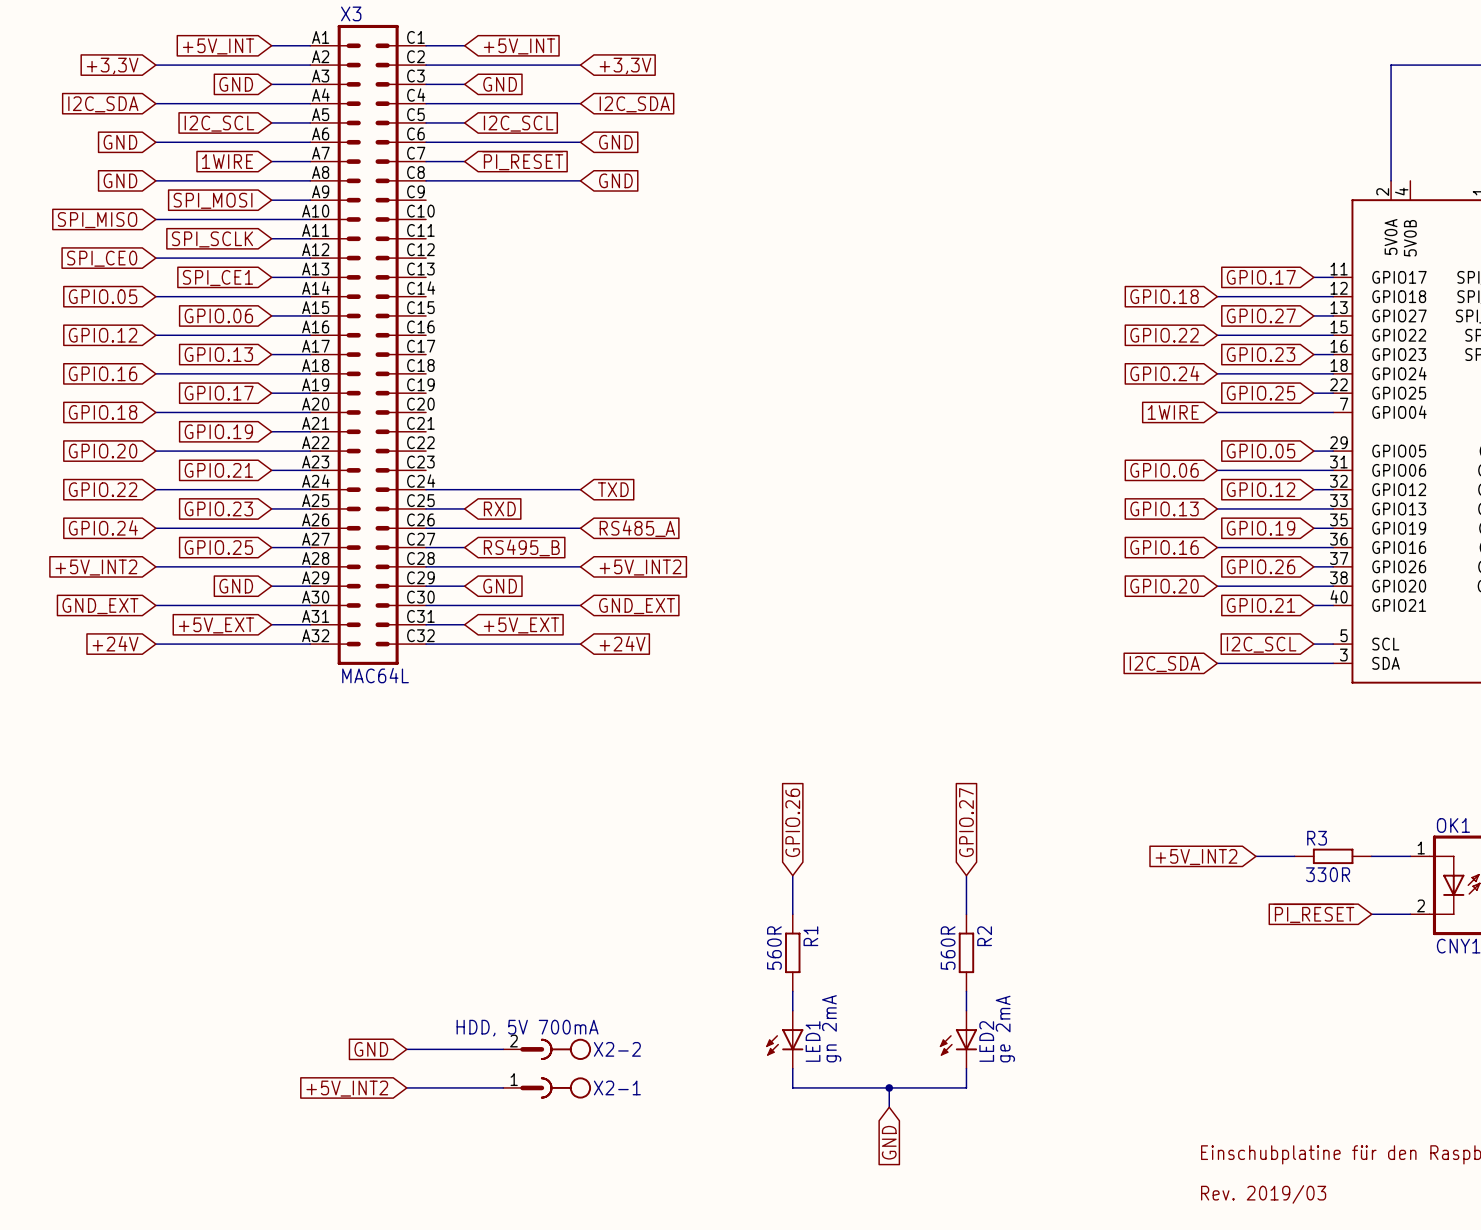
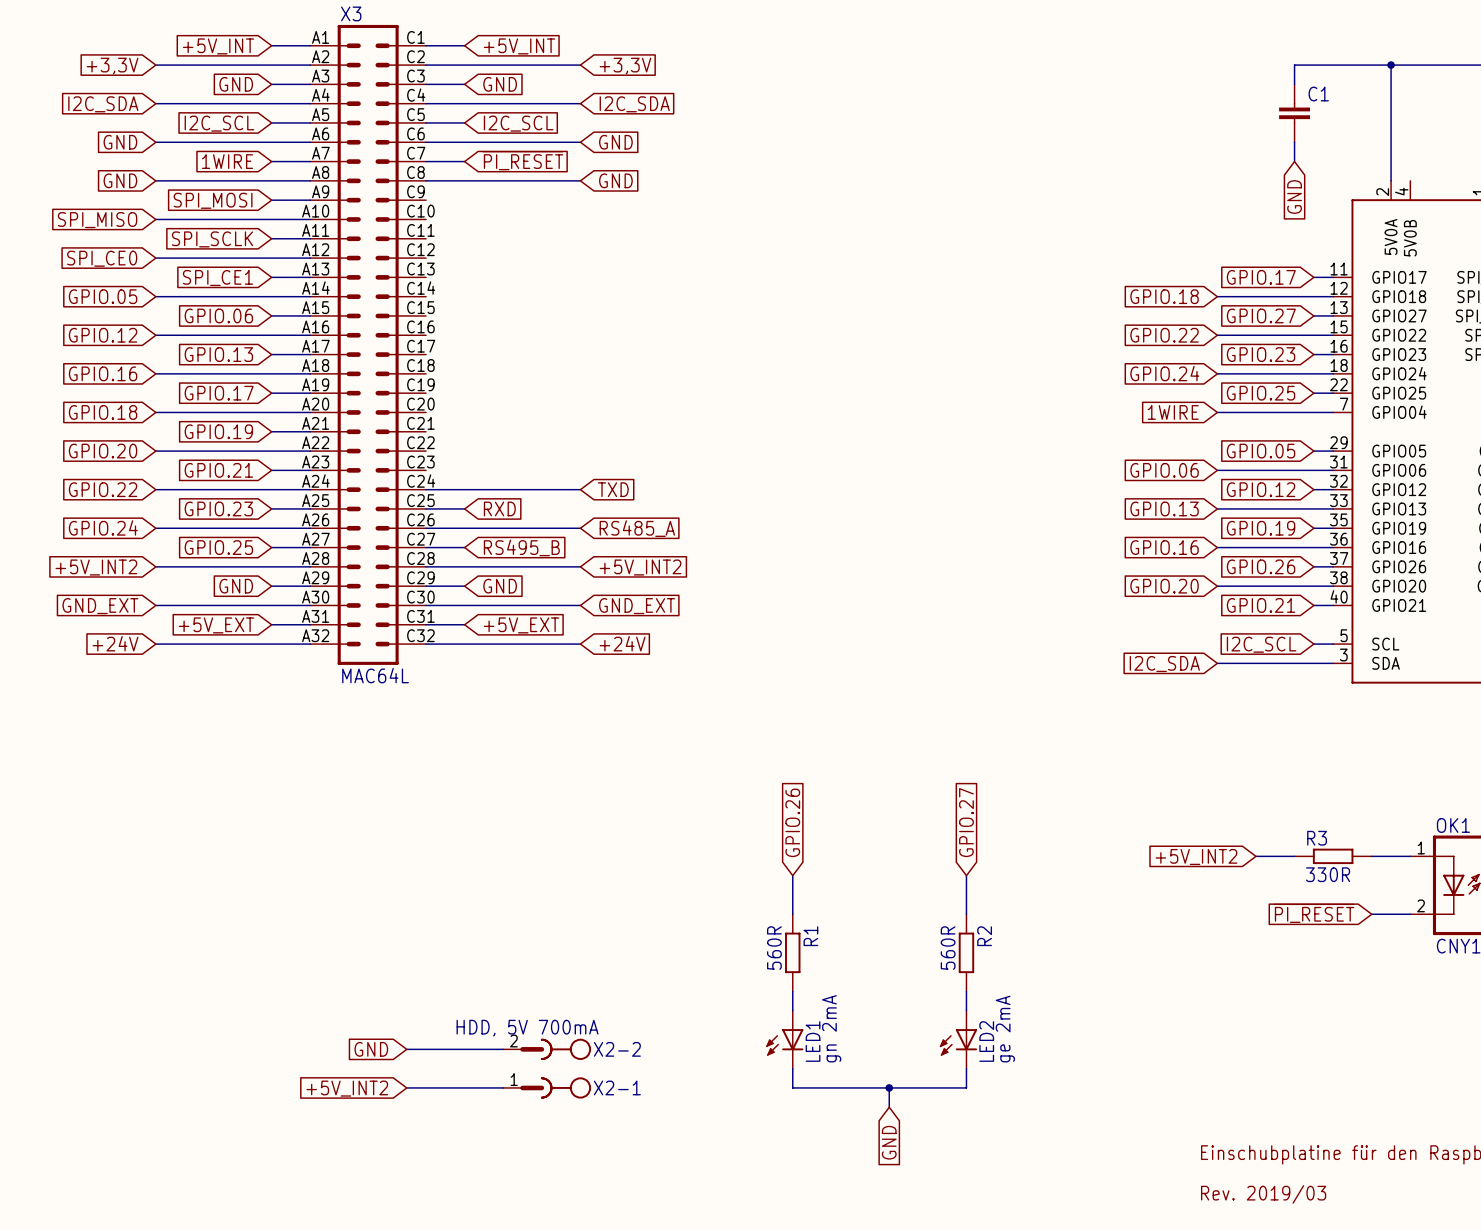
wire: none -> (1391, 65) (1294, 65) (1294, 84)
junction: none -> (1391, 65)
C1: none -> (1294, 113)
wire: none -> (1294, 142) (1294, 161)
global label: none -> GND (1294, 197)

